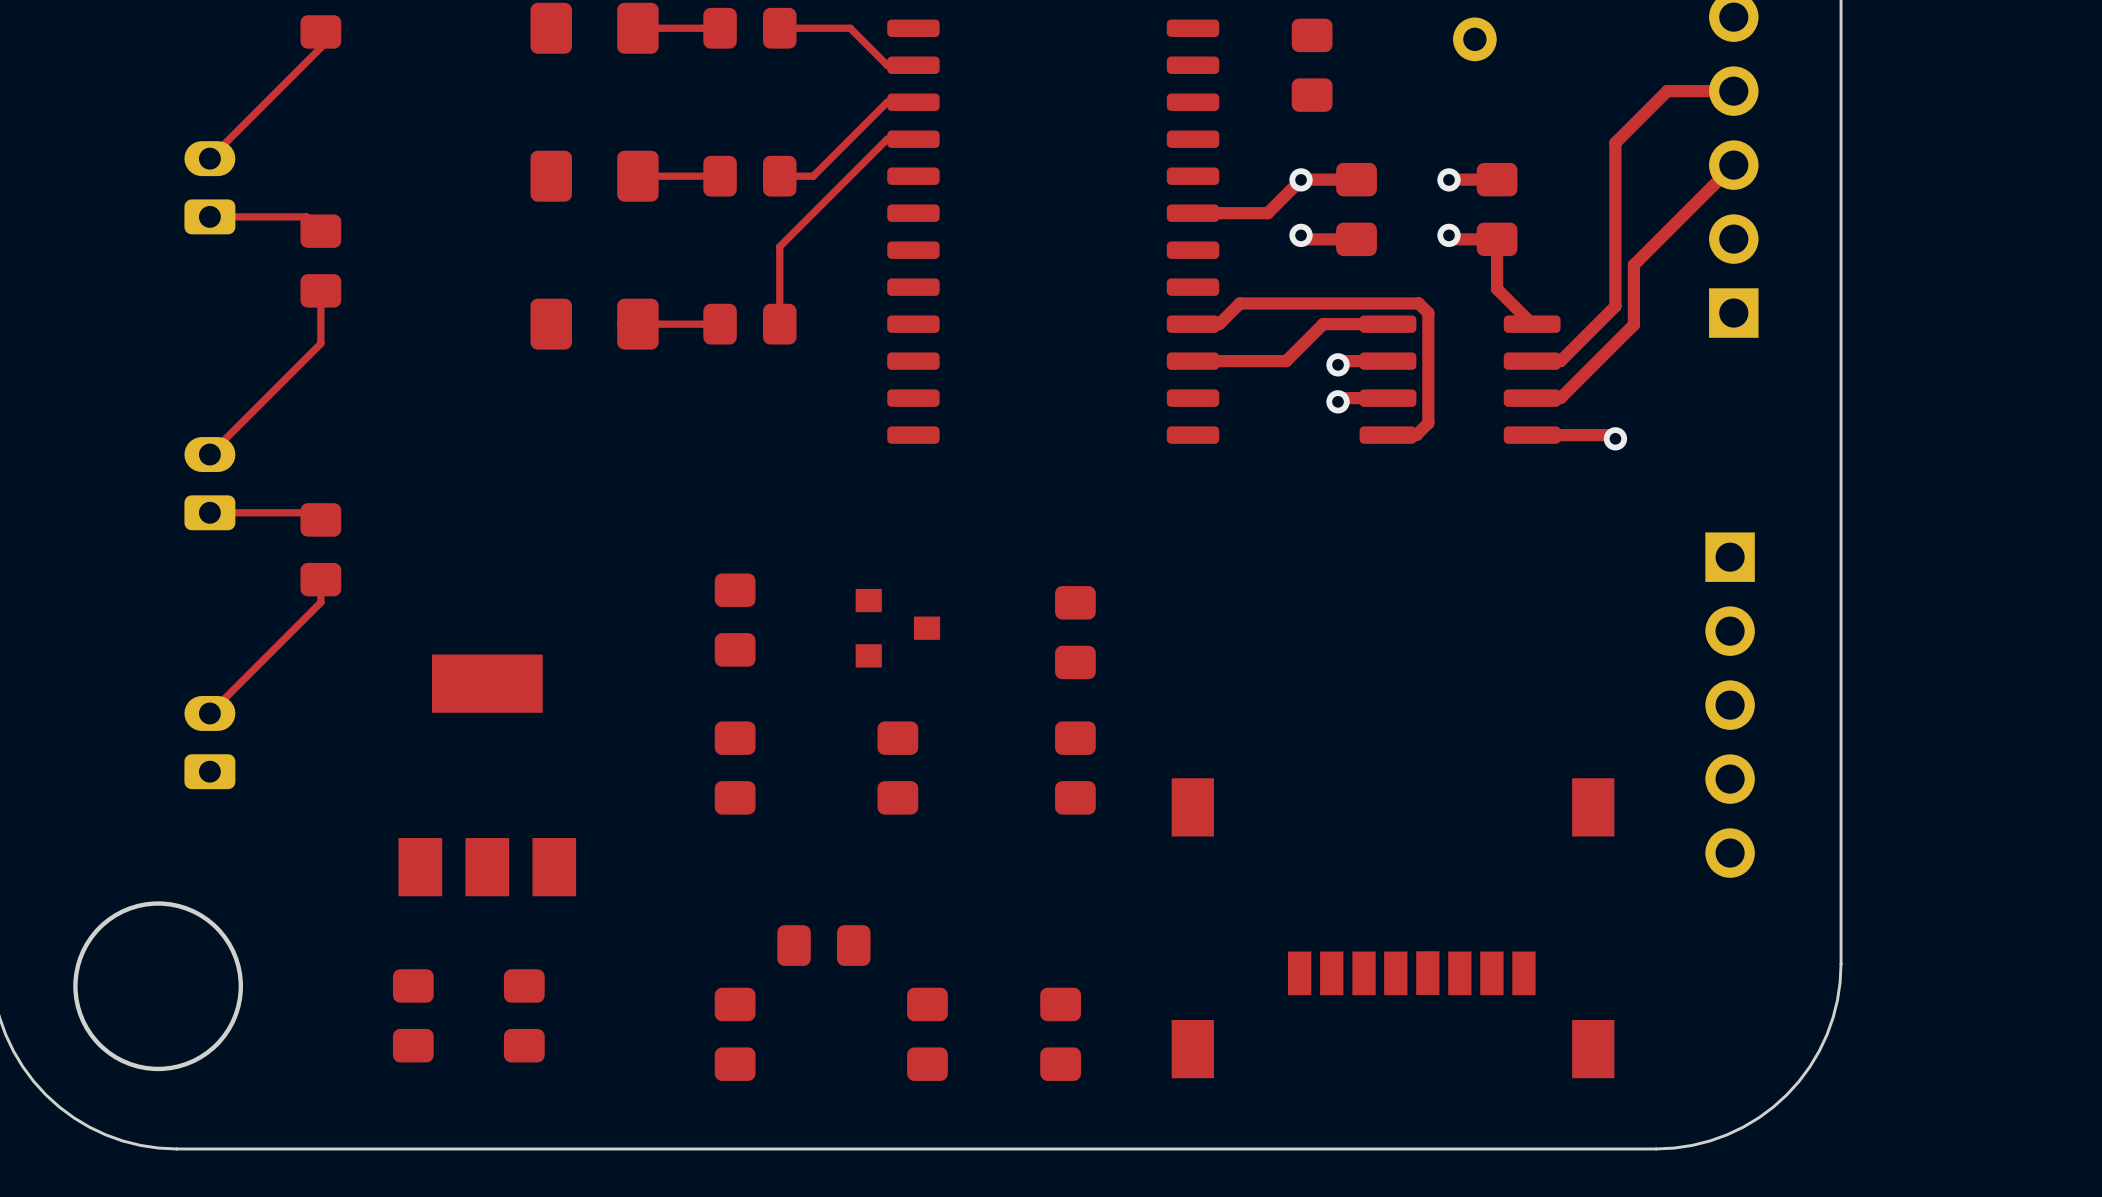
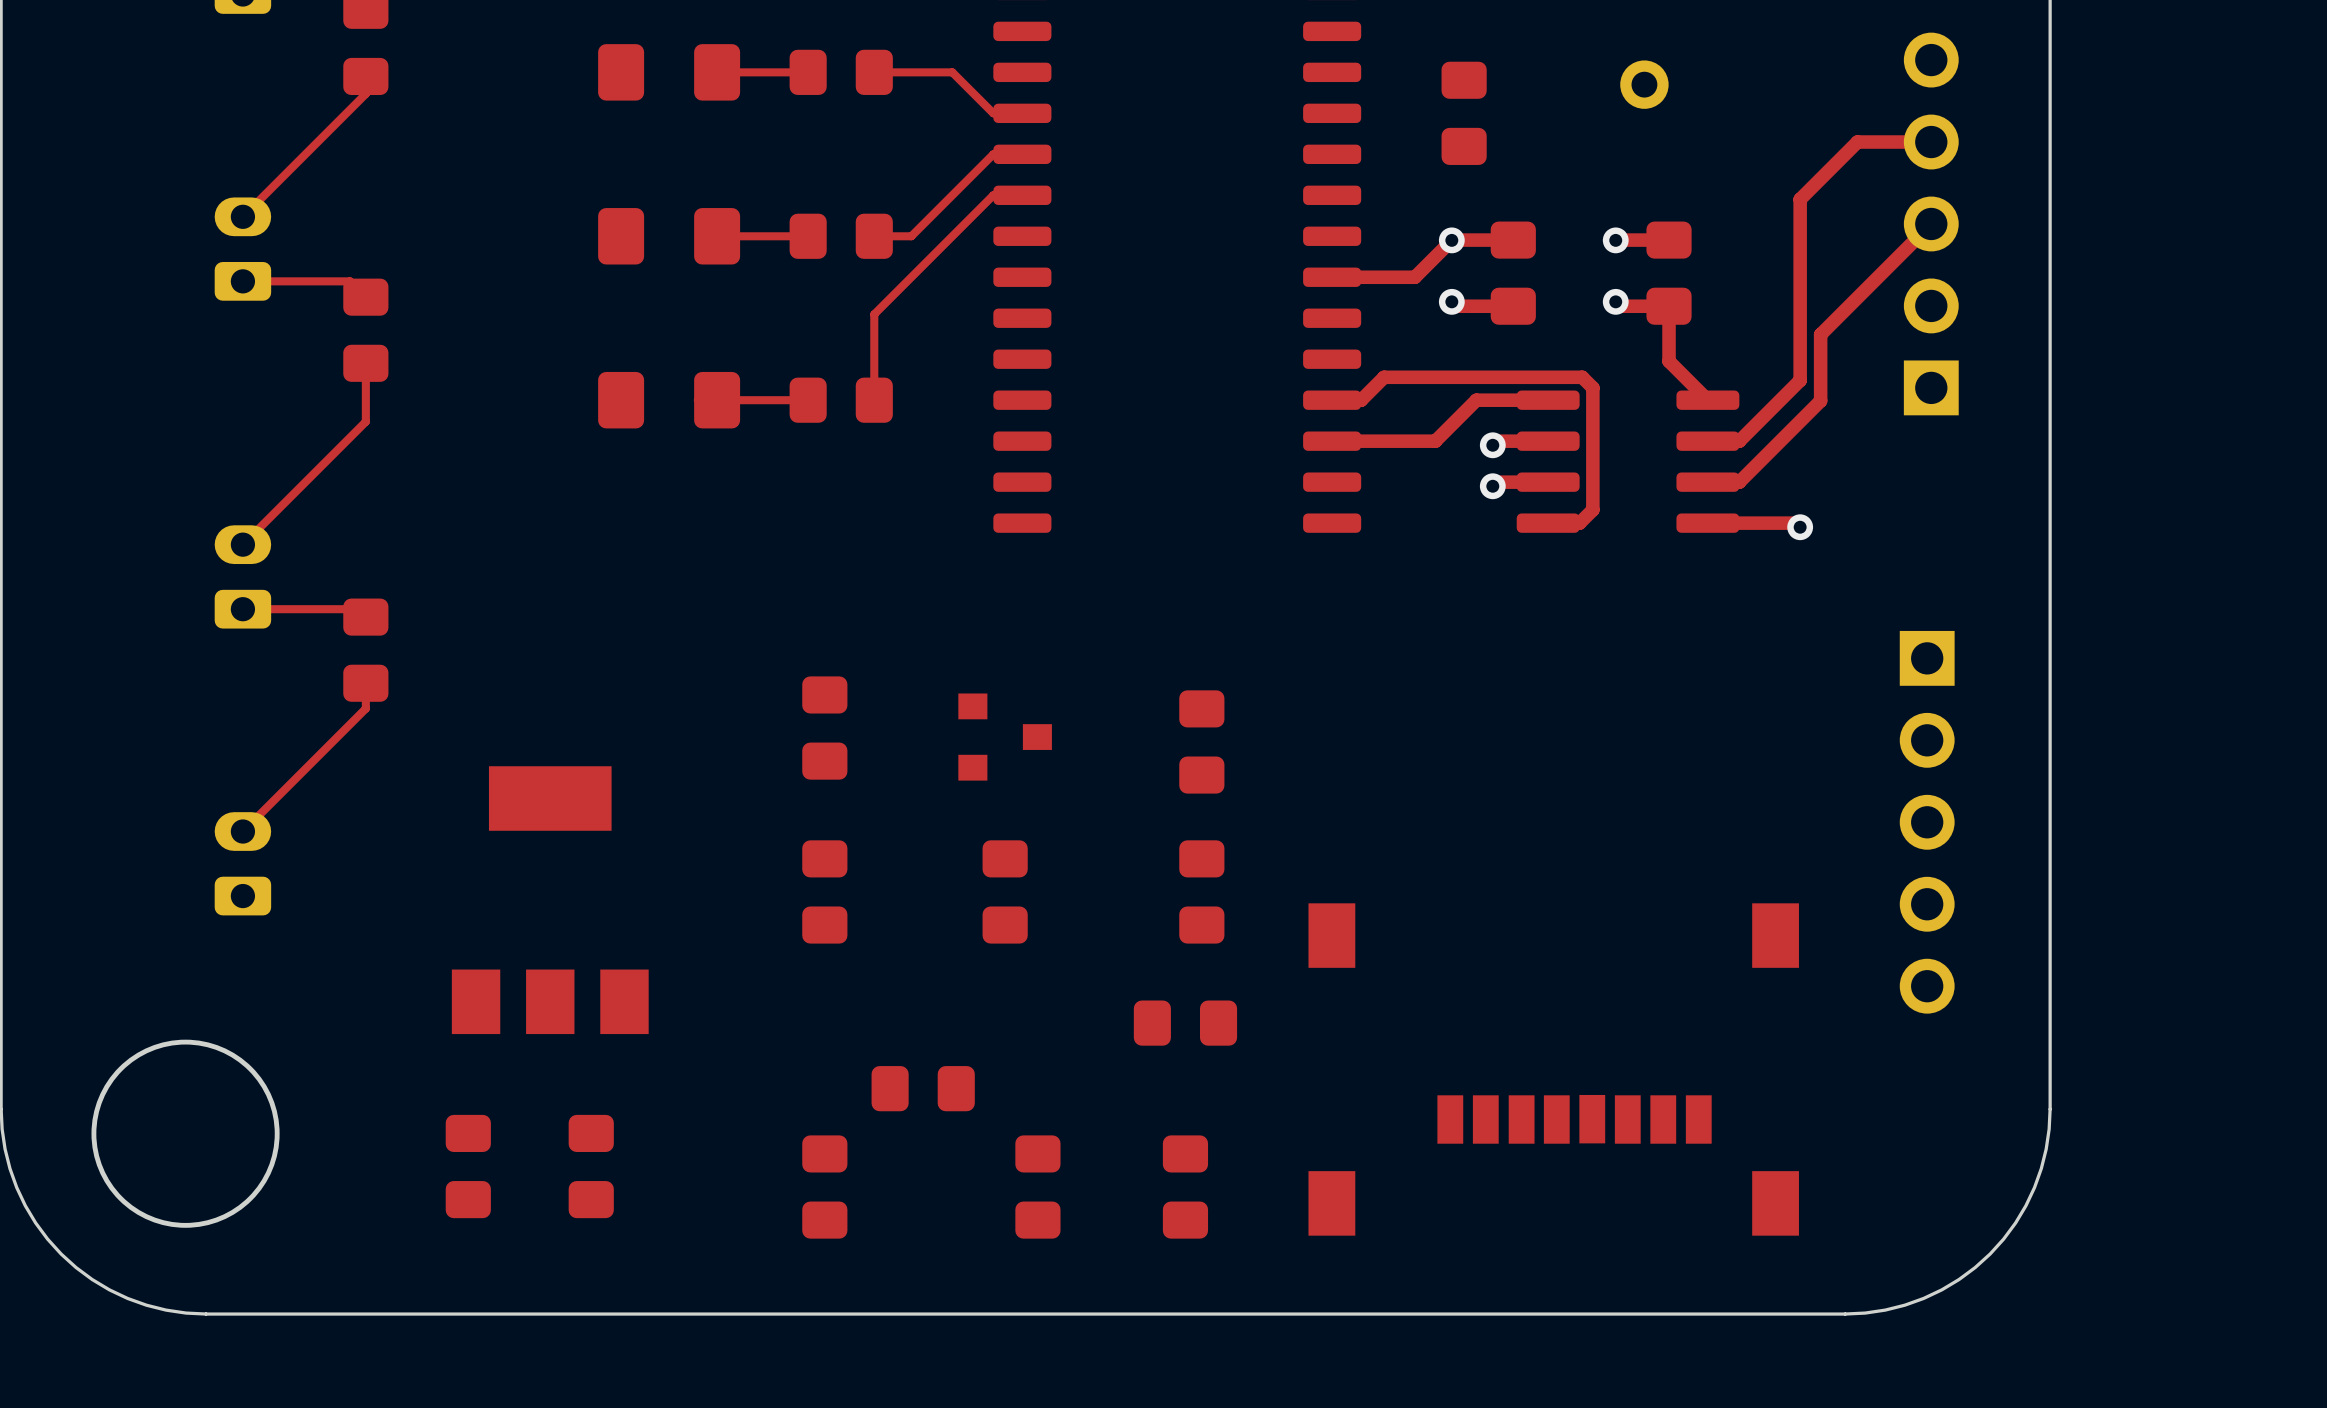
part: none -> (1185, 1023)

